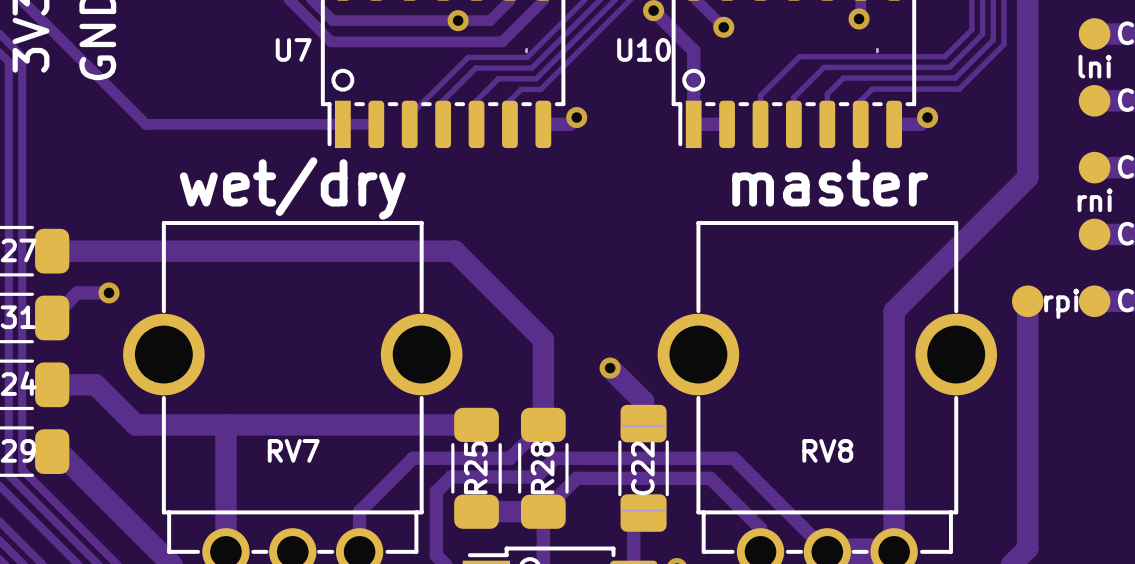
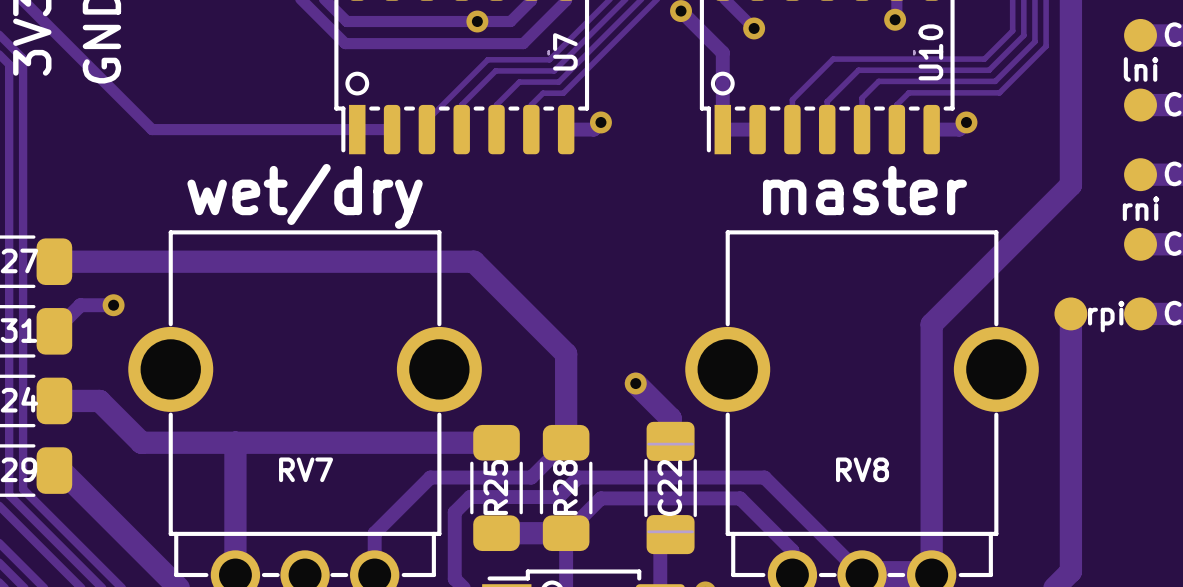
U7 name rotation: 0° (293, 49) -> 90° counterclockwise (565, 51)
U7 name position: U7 (293, 49) -> U7 (565, 51)
U10 name rotation: 0° (644, 49) -> 90° counterclockwise (930, 52)
U10 name position: U10 (644, 49) -> U10 (930, 52)

